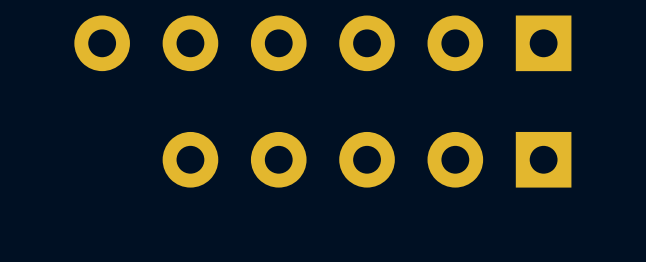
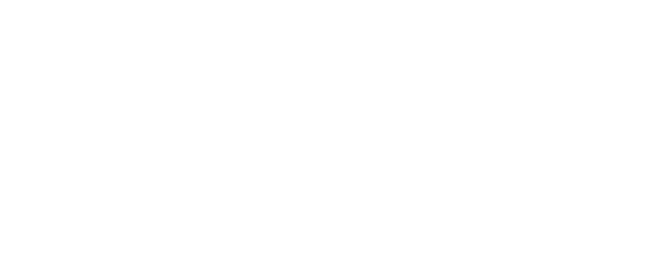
part: (322, 43) -> none
part: (367, 159) -> none

